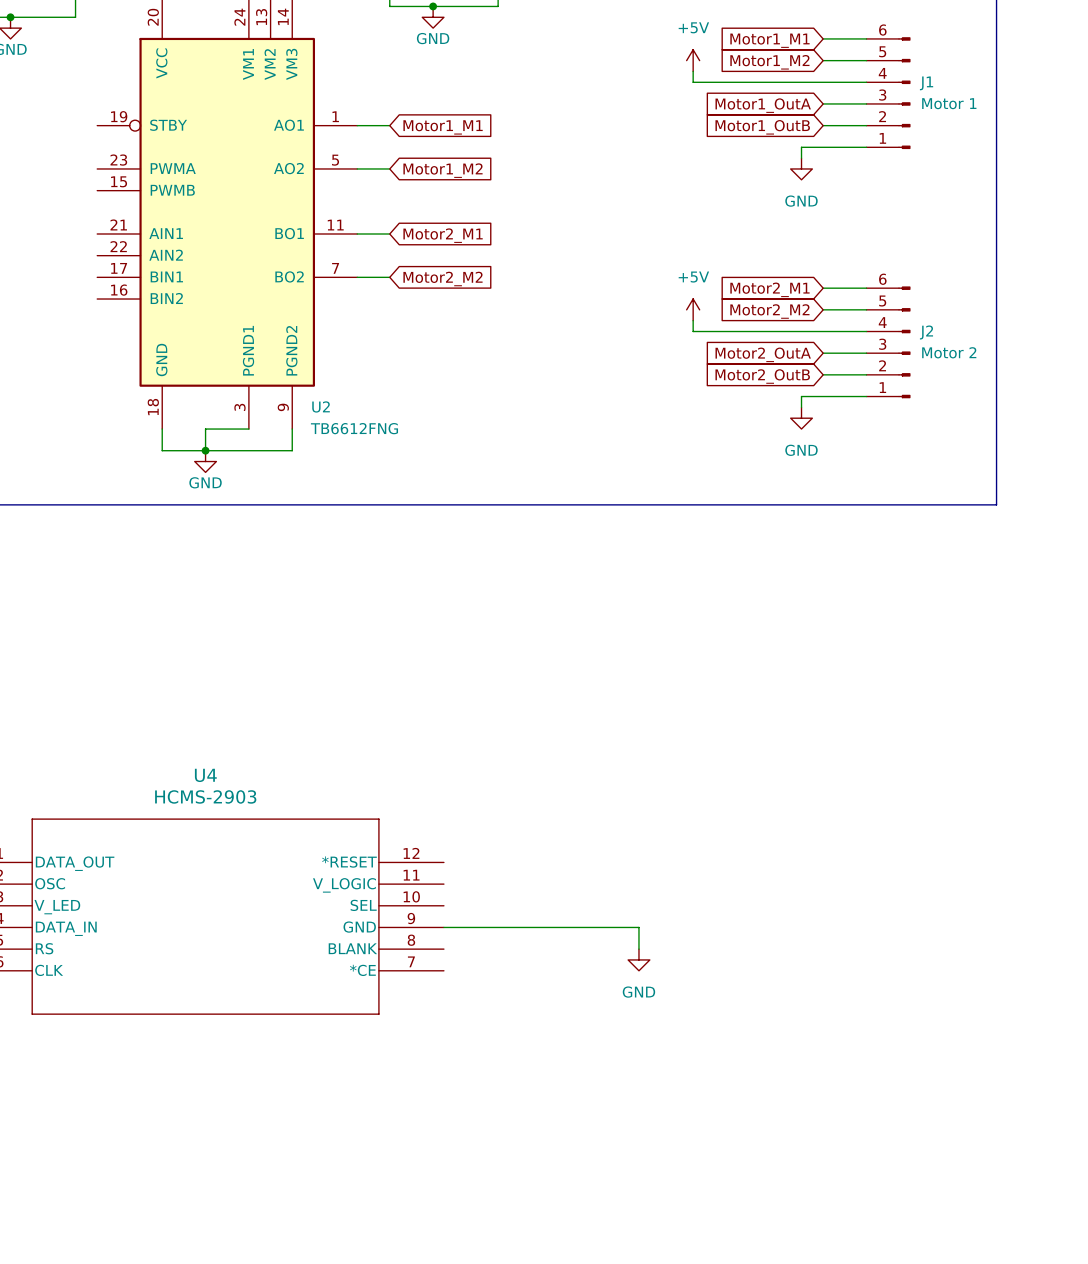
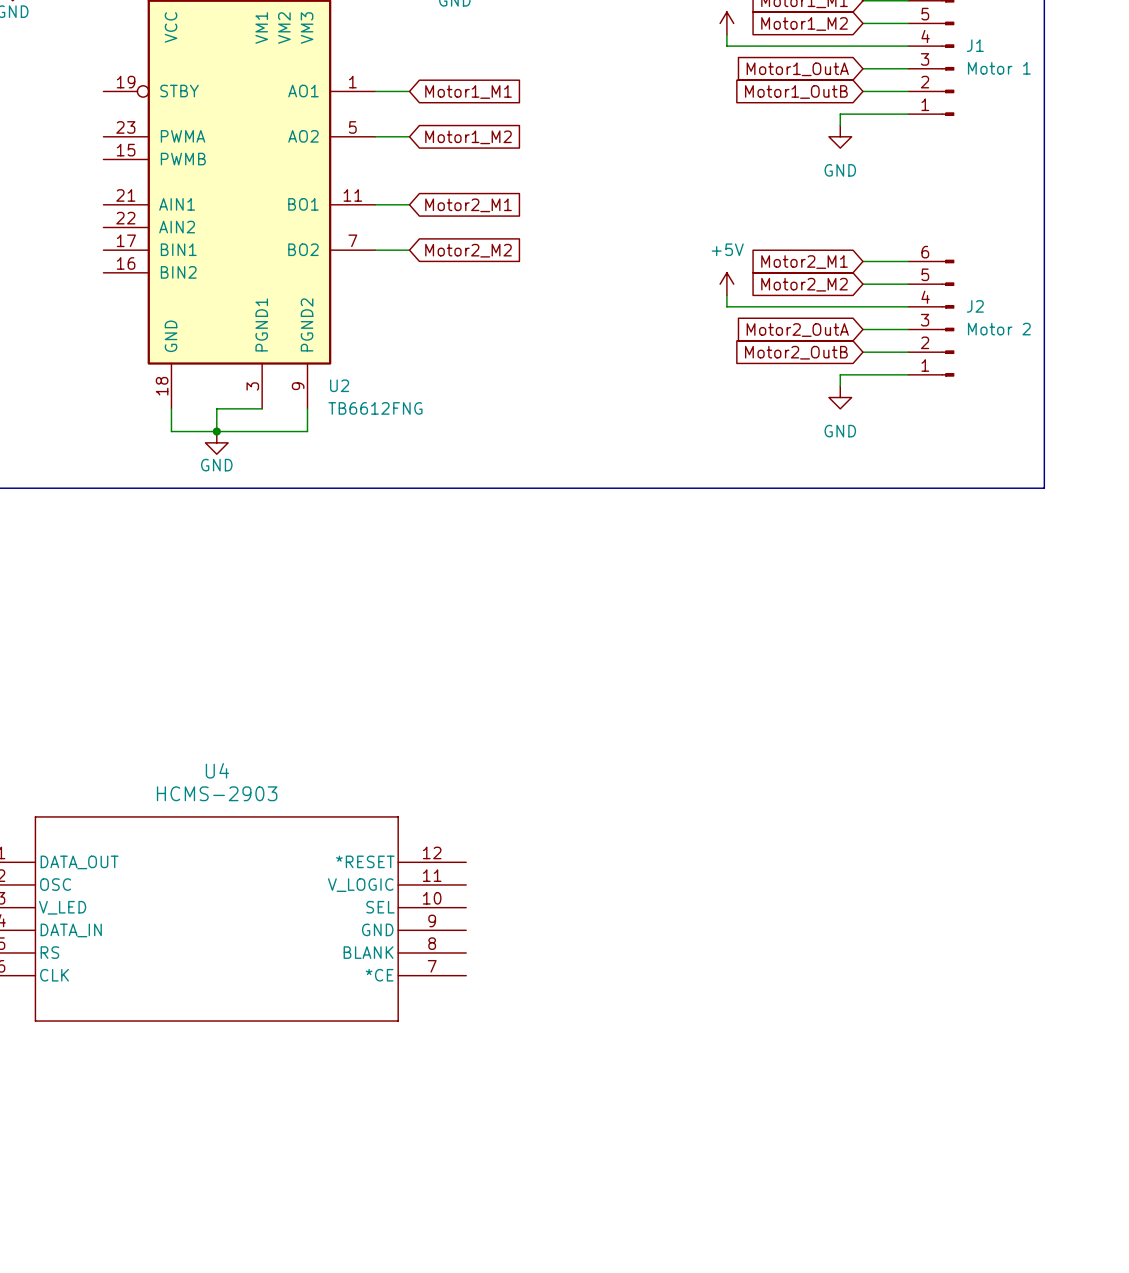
wire: (443, 927) (638, 927) (638, 949) -> none
power symbol: GND (638, 959) -> none

